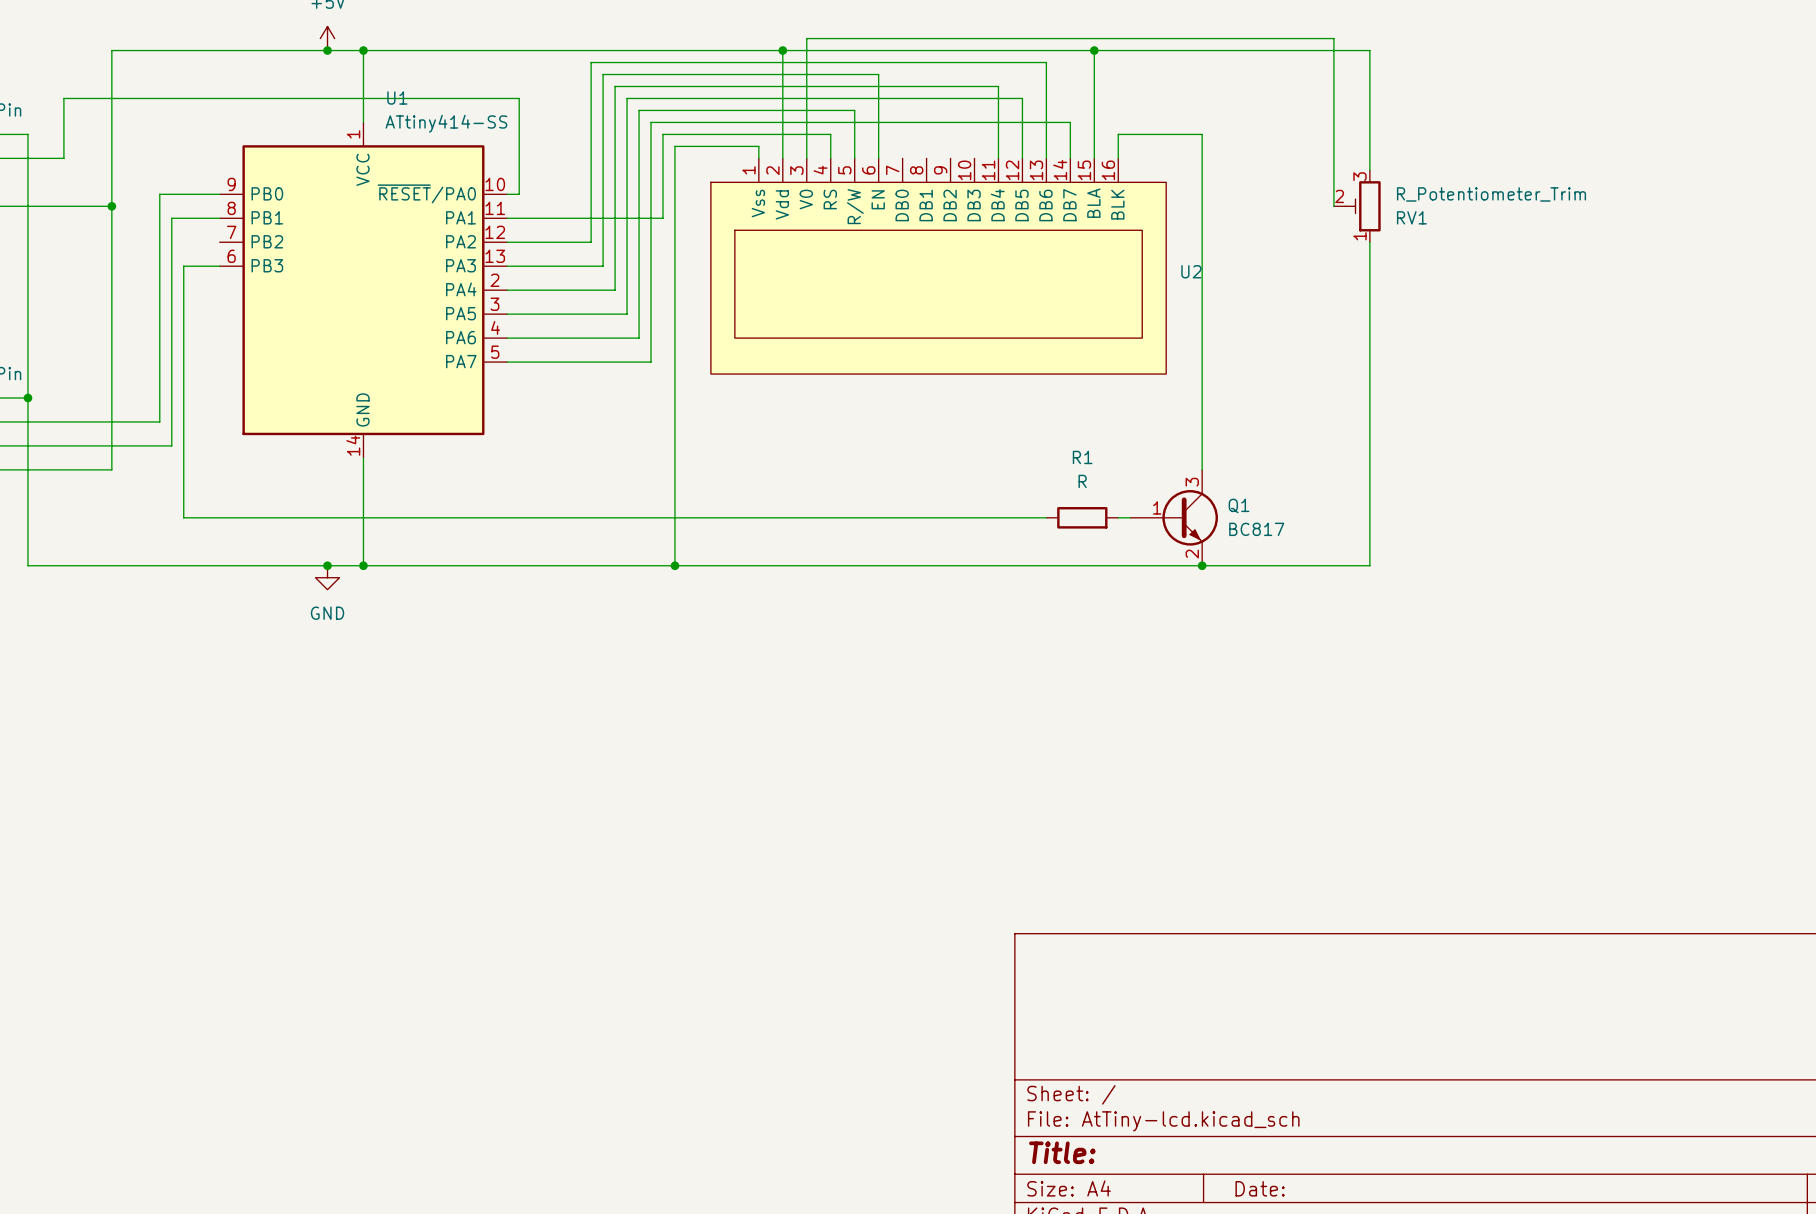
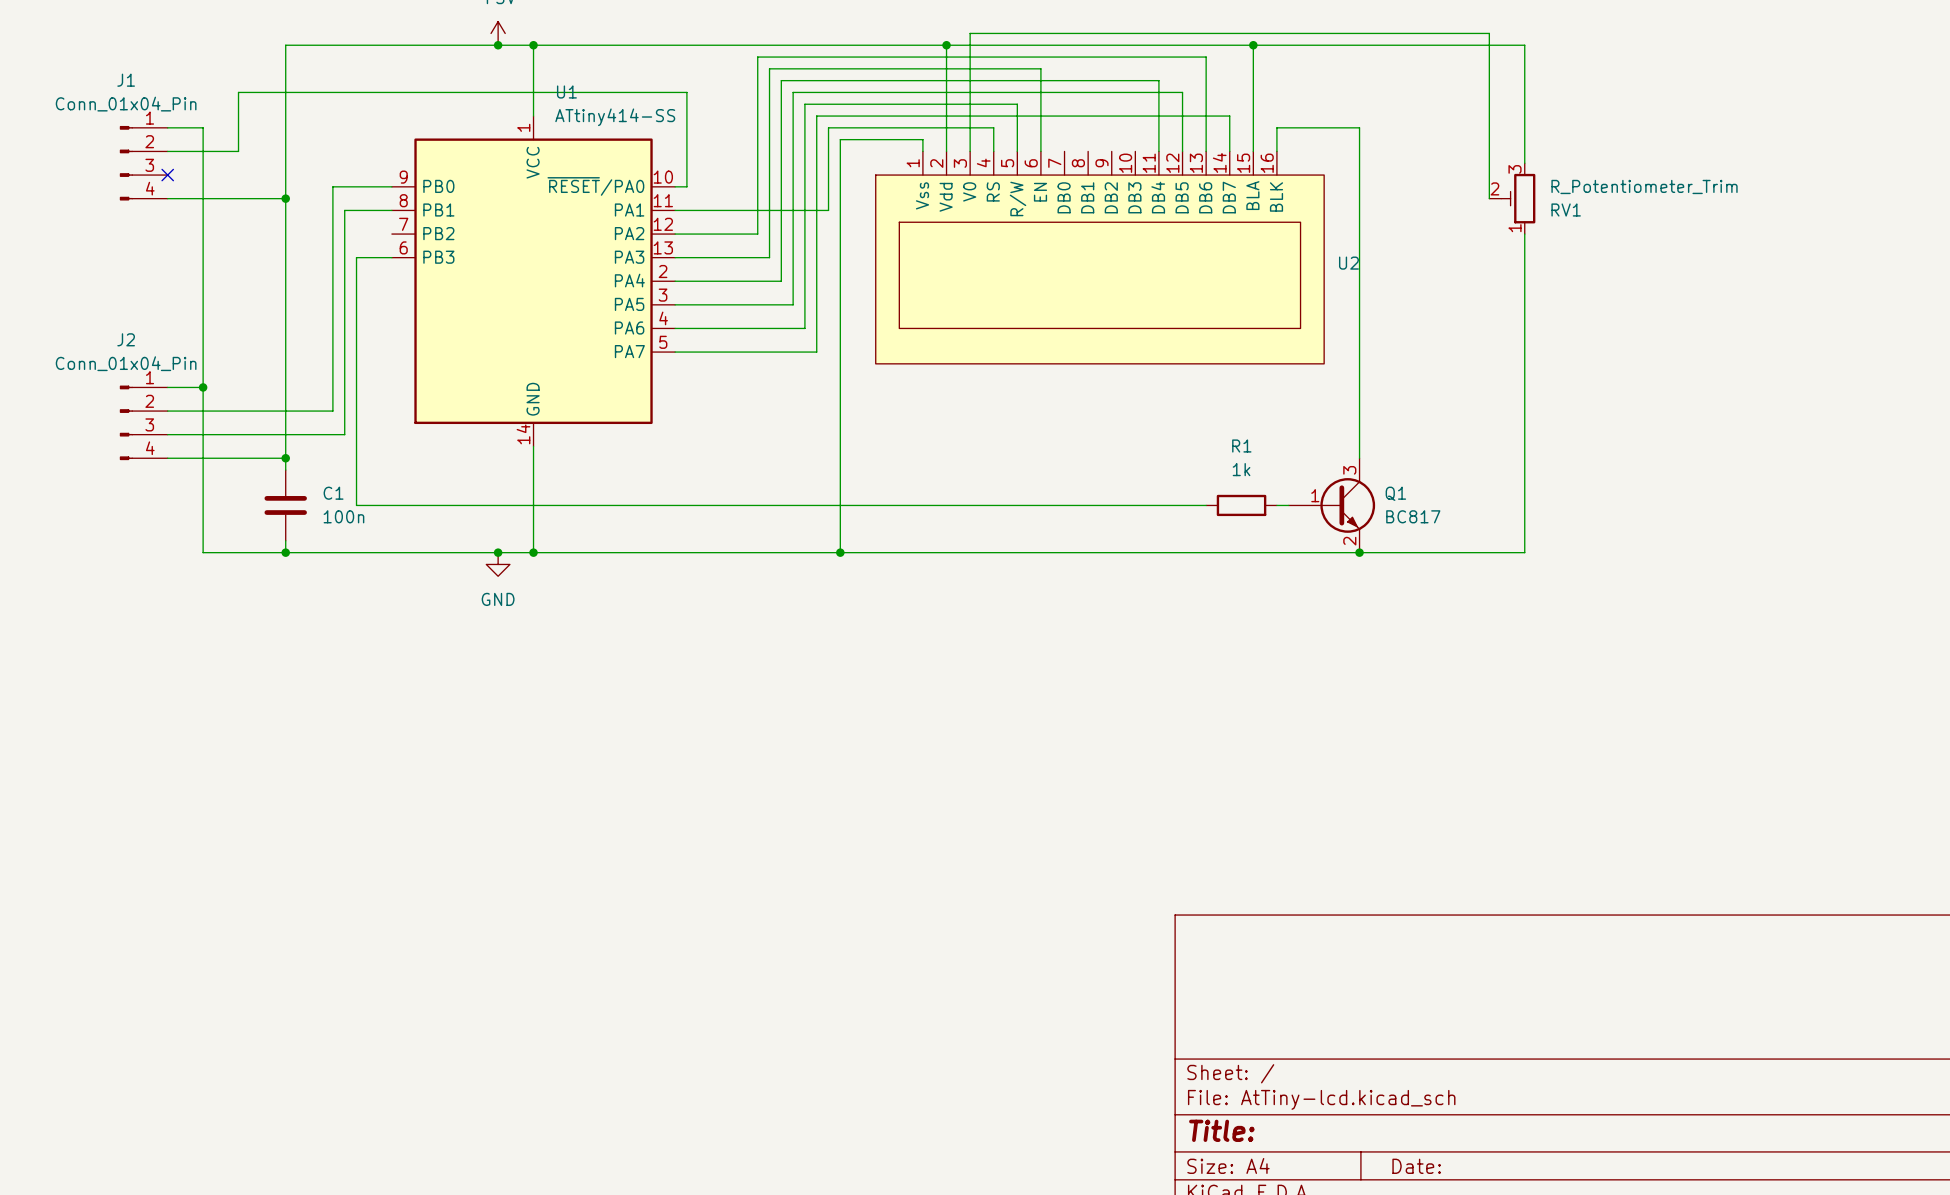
wire: none -> (285, 458) (285, 470)
junction: none -> (285, 458)
R1 value: R (1082, 481) -> 1k (1241, 469)
C1: none -> 100n (285, 505)
wire: none -> (285, 540) (285, 552)
junction: none -> (285, 552)

